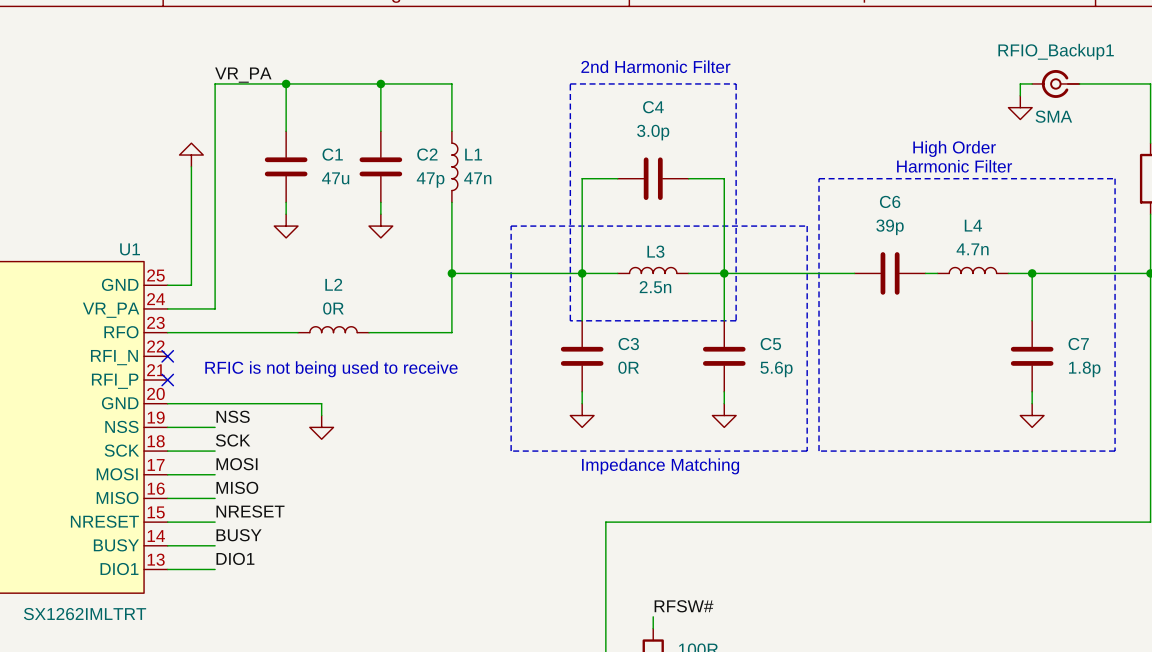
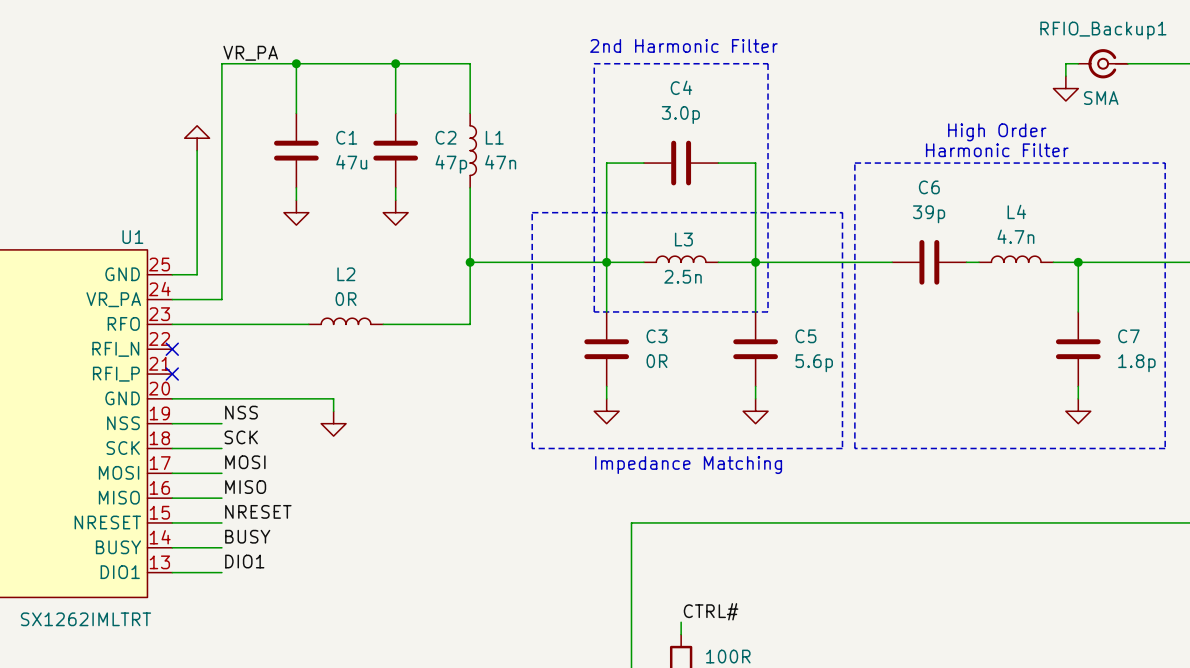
text: RFIC is not being used to receive (331, 369) -> none
label: RFSW# (684, 606) -> CTRL# (711, 611)

